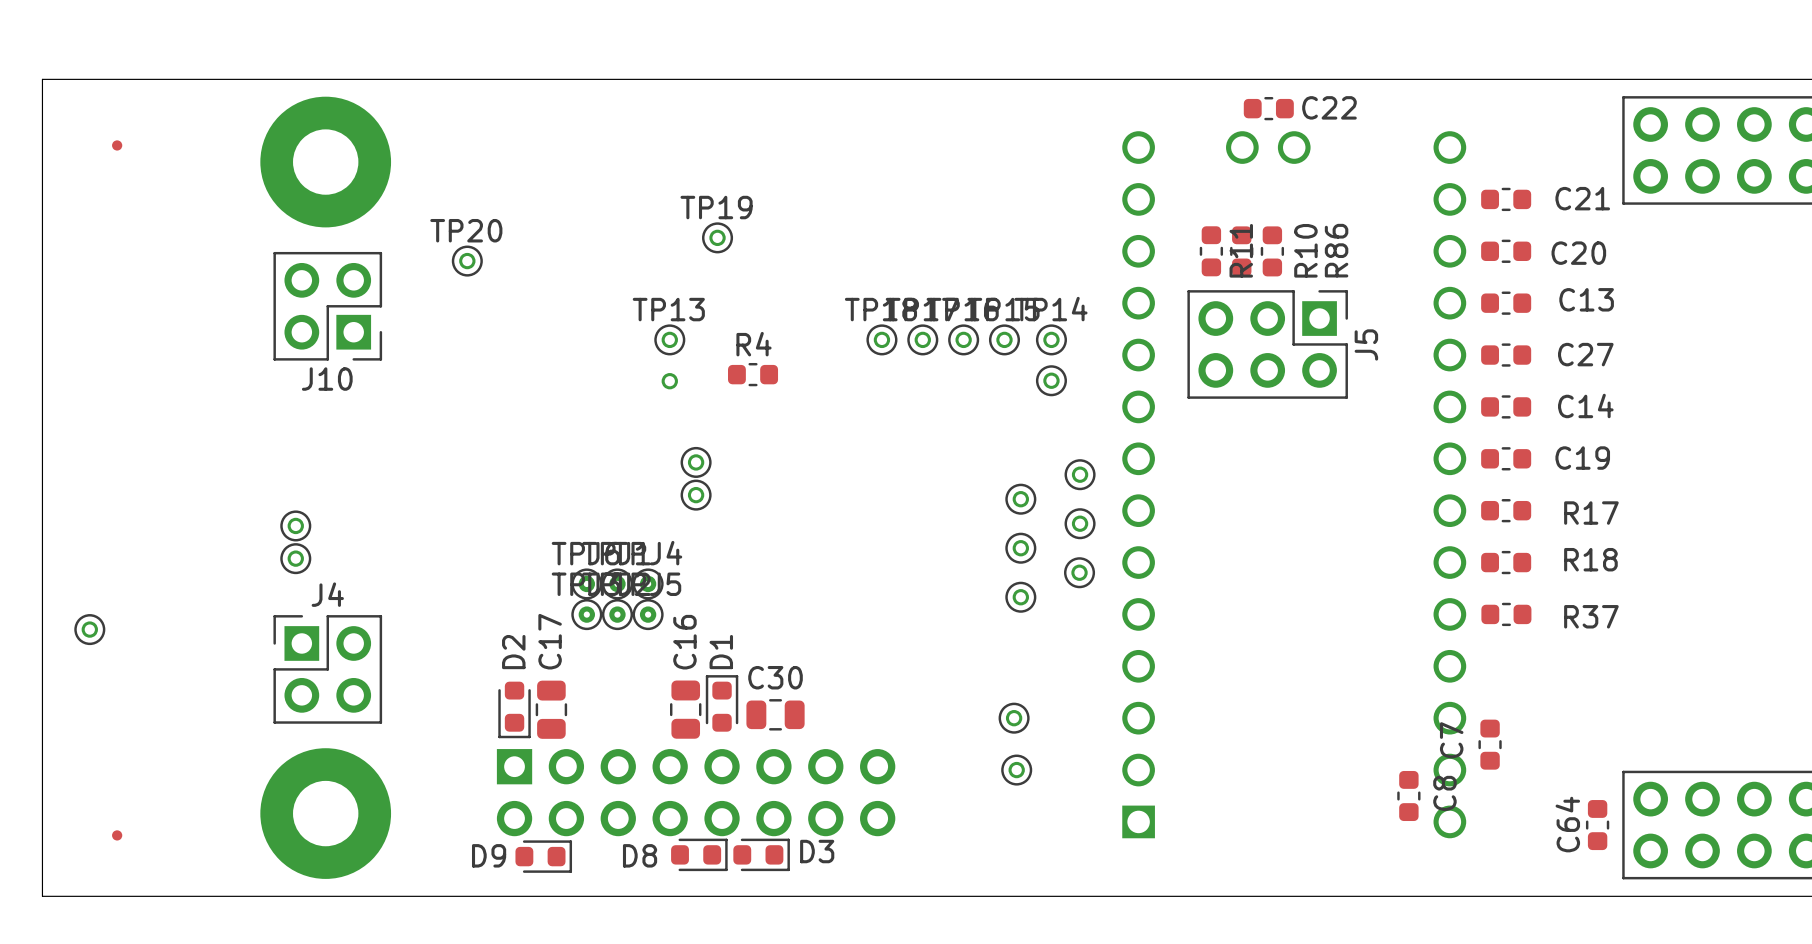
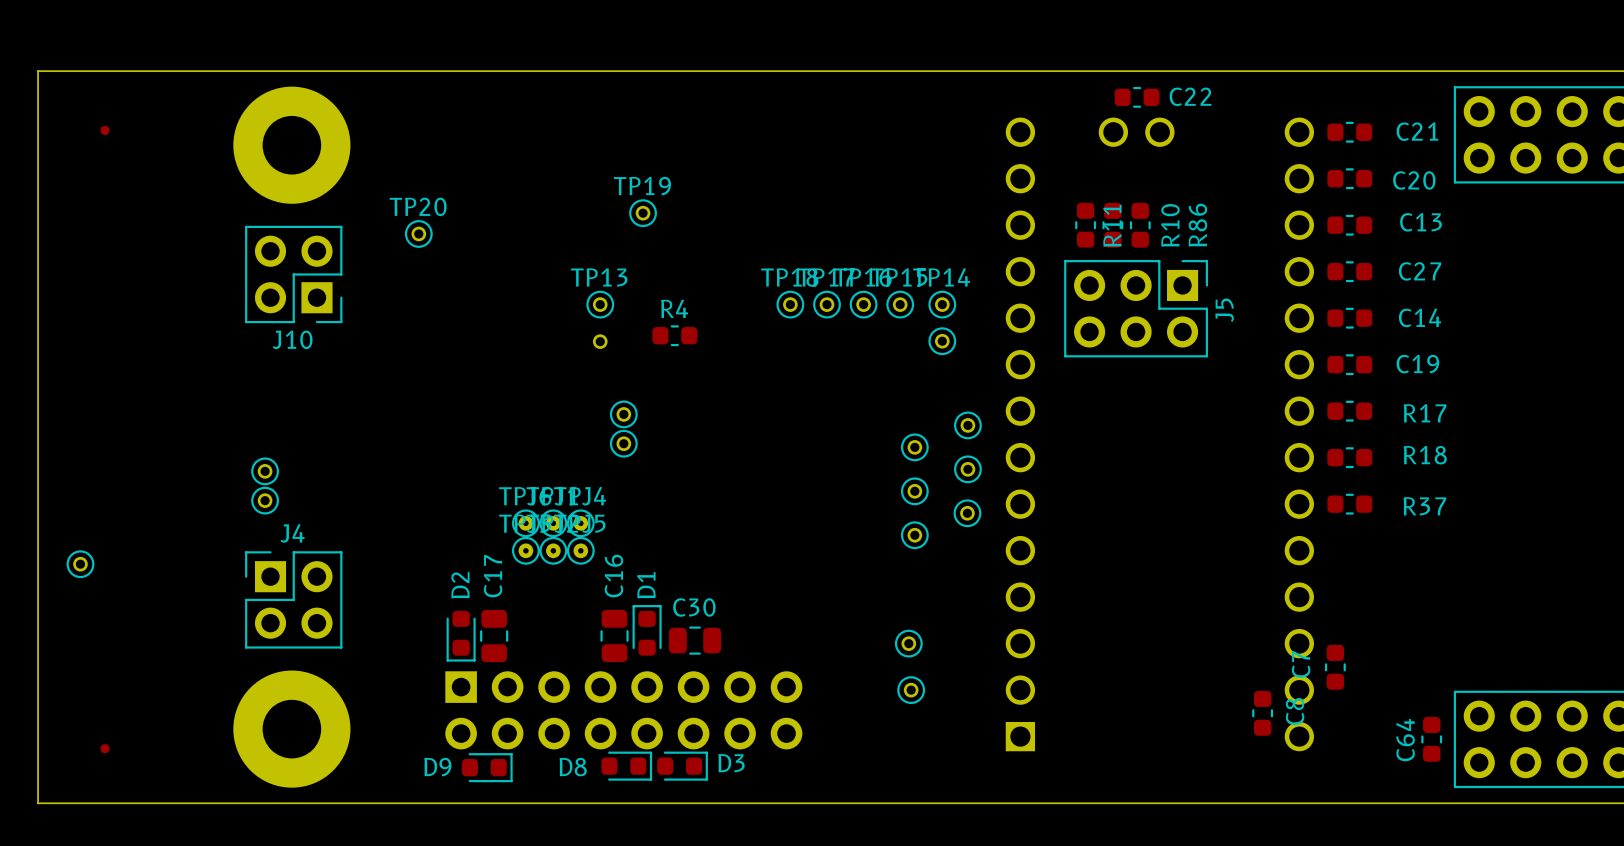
C21: none -> (1349, 132)
C21 name: C21 (1582, 198) -> C20 (1414, 180)
C20 name: C20 (1578, 253) -> C13 (1420, 222)
C13 name: C13 (1586, 299) -> C27 (1420, 271)
C27 name: C27 (1585, 354) -> C14 (1420, 317)
C14 name: C14 (1585, 405) -> C19 (1417, 364)
C19 name: C19 (1582, 458) -> R17 (1425, 413)
R17 name: R17 (1591, 513) -> R18 (1425, 455)
R18 name: R18 (1590, 559) -> R37 (1424, 506)
R37: (1506, 614) -> none

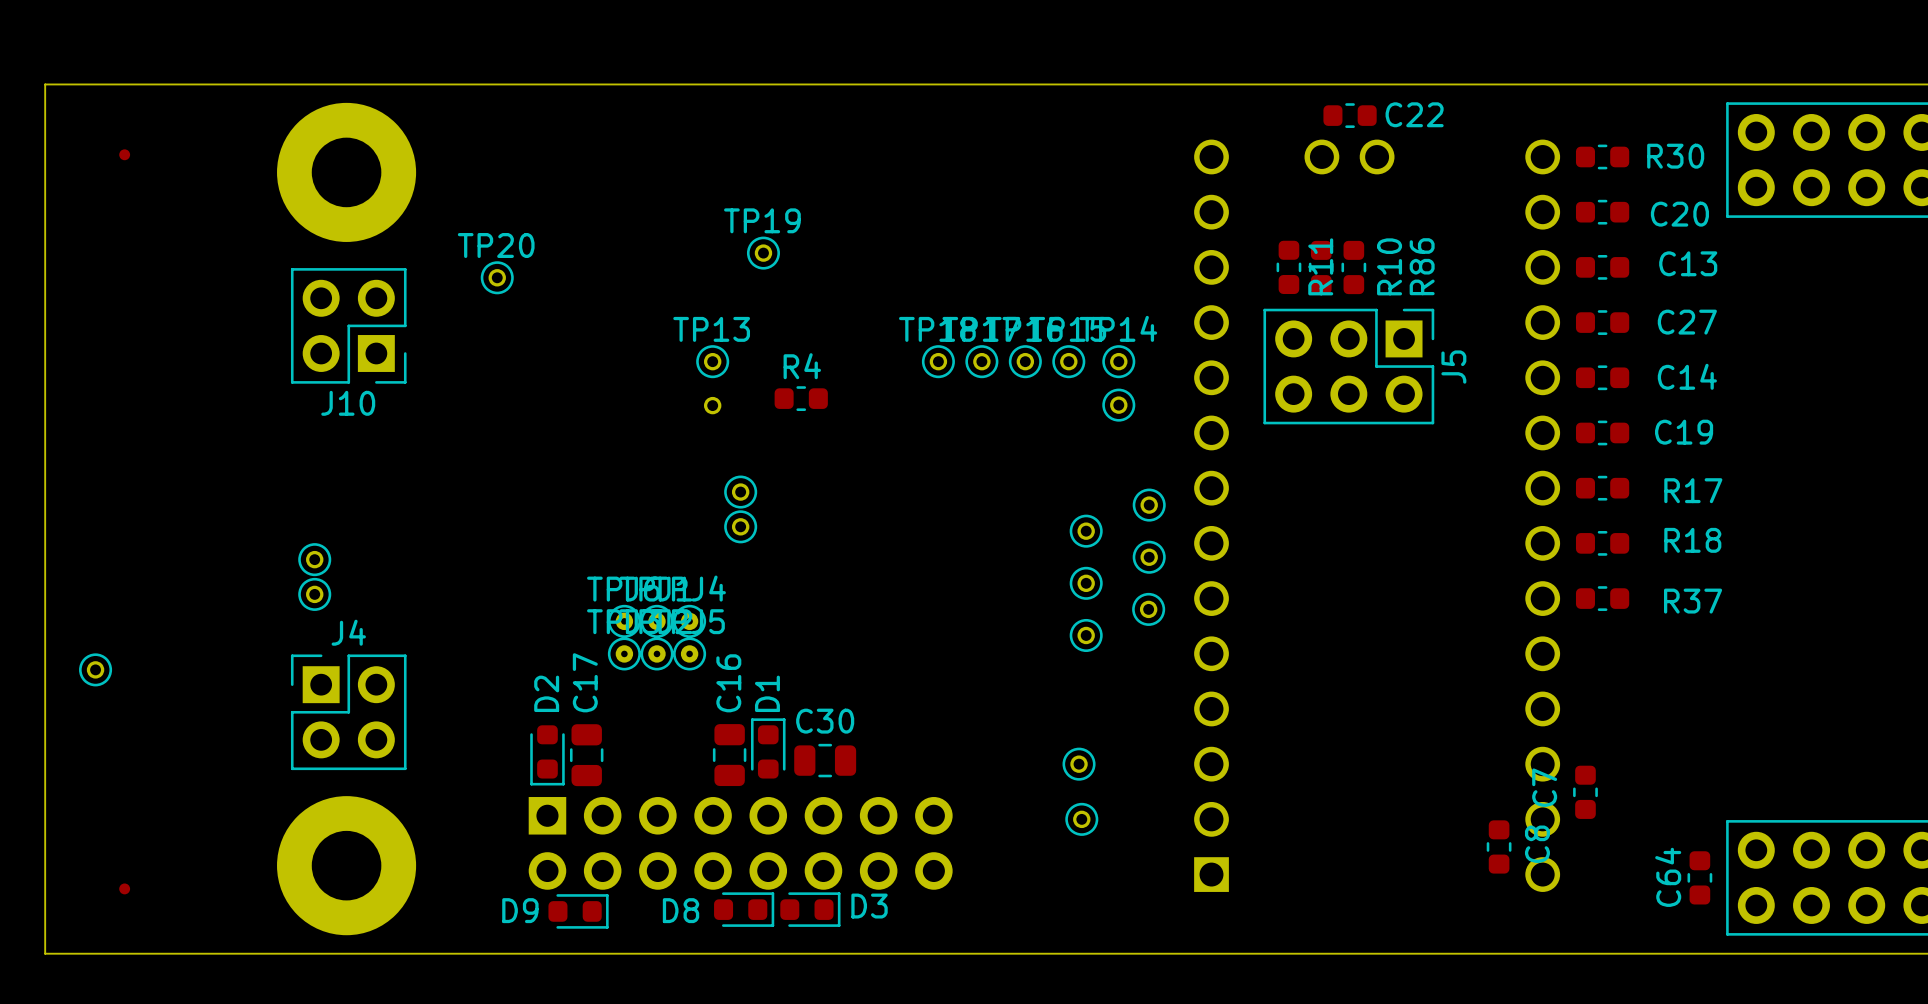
C21 name: C21 (1417, 131) -> R30 (1675, 156)

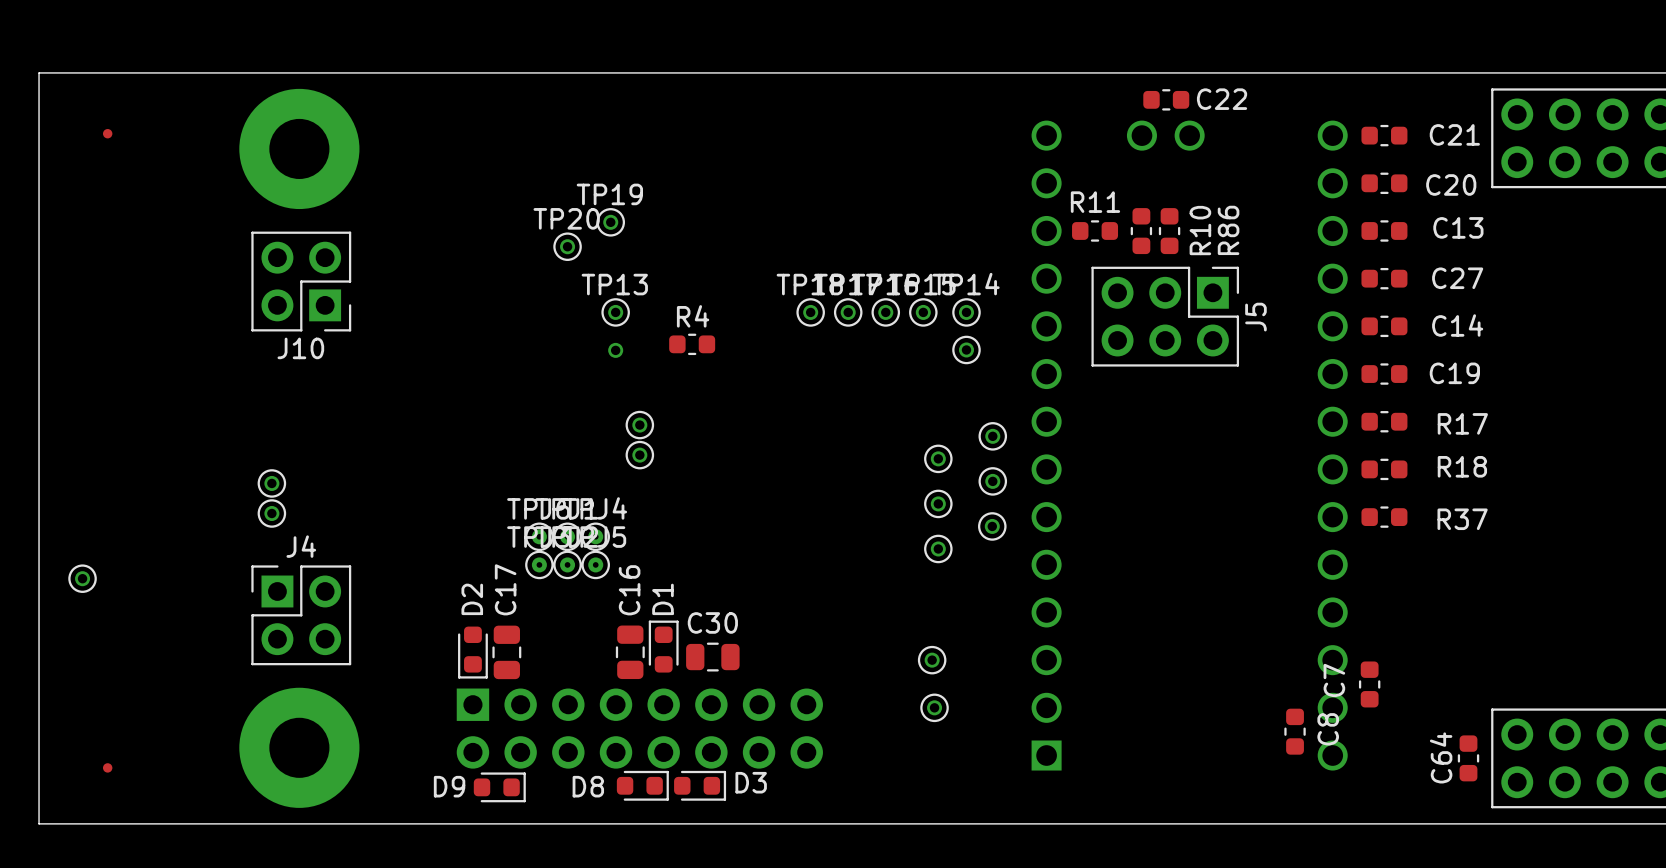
R30 name: R30 (1675, 156) -> C21 (1454, 134)
TP19 position: (763, 253) -> (610, 222)
R11 name position: R11 (1320, 266) -> R11 (1095, 202)
R11 rotation: 0° (1288, 267) -> 90° clockwise (1095, 230)
TP20 position: (497, 277) -> (567, 246)

